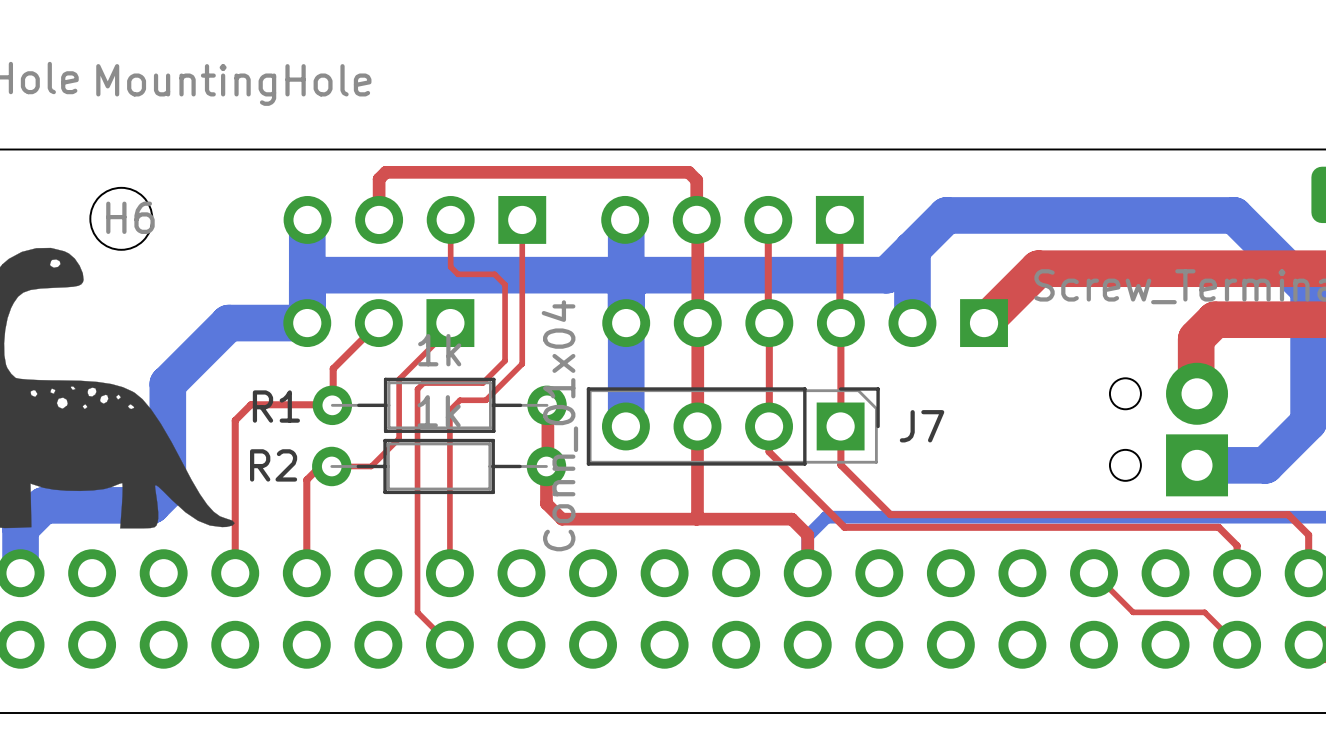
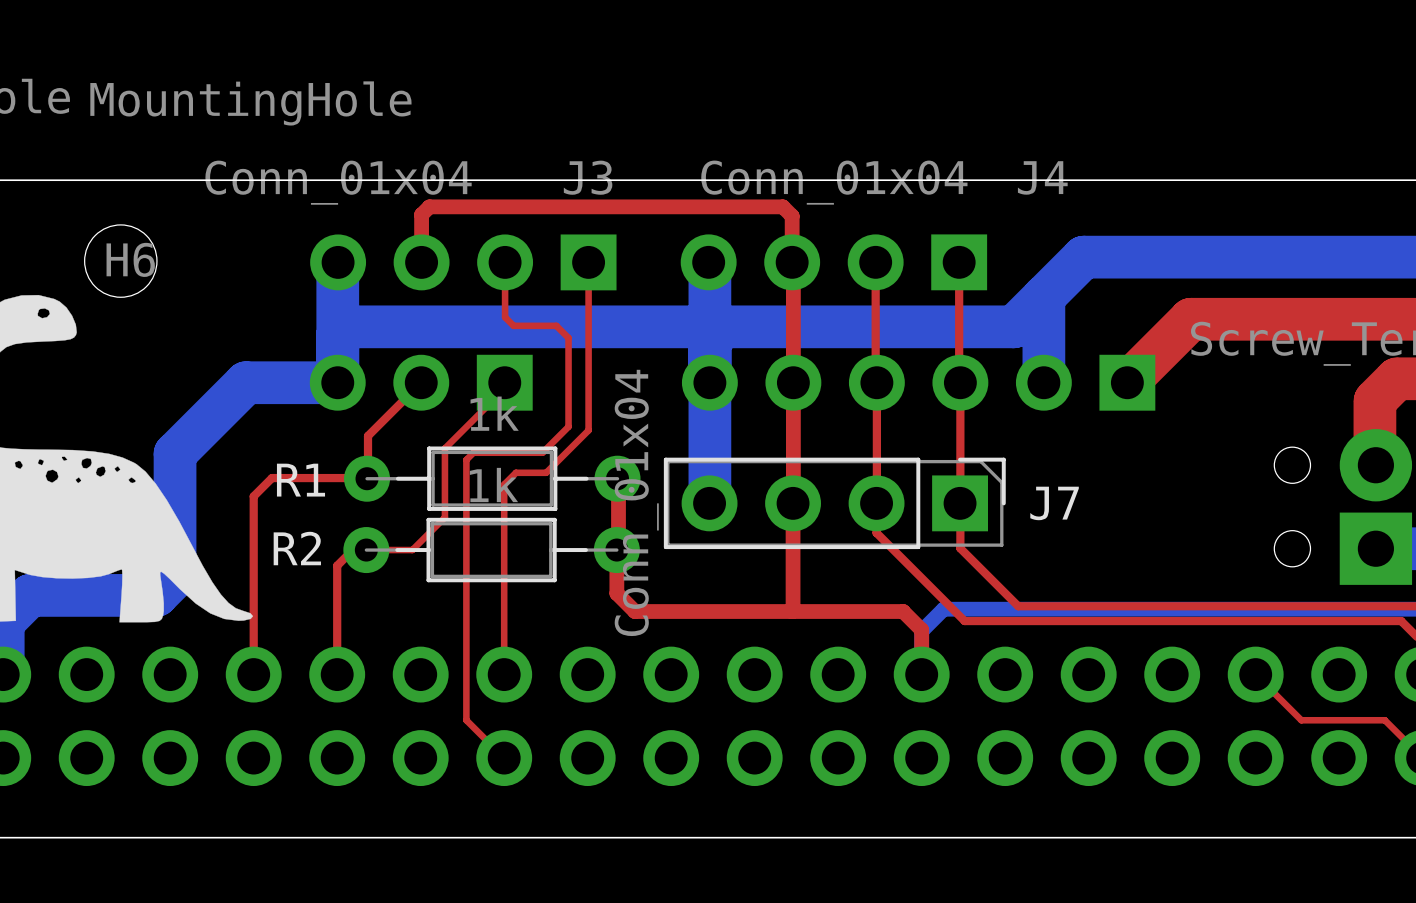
J4 name: none -> J4 (1042, 177)
J3 name: none -> J3 (588, 177)
J4 value: none -> Conn_01x04 (834, 182)
J3 value: none -> Conn_01x04 (338, 182)

